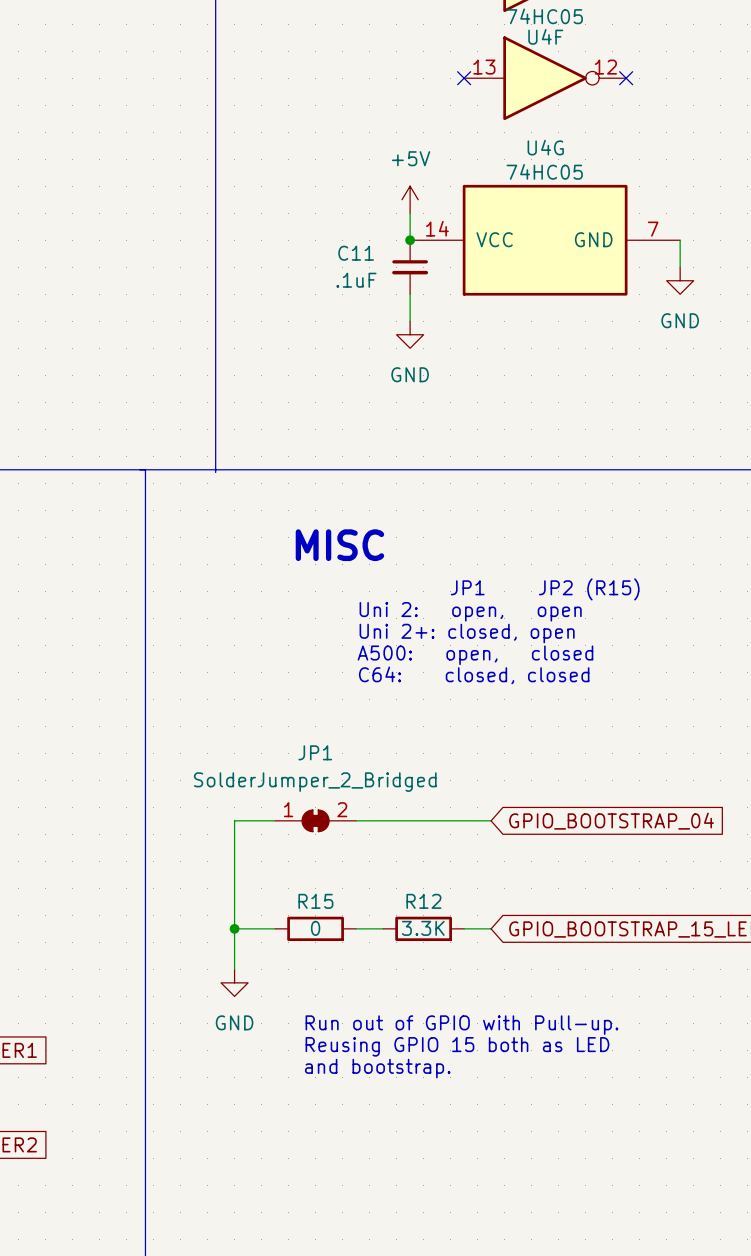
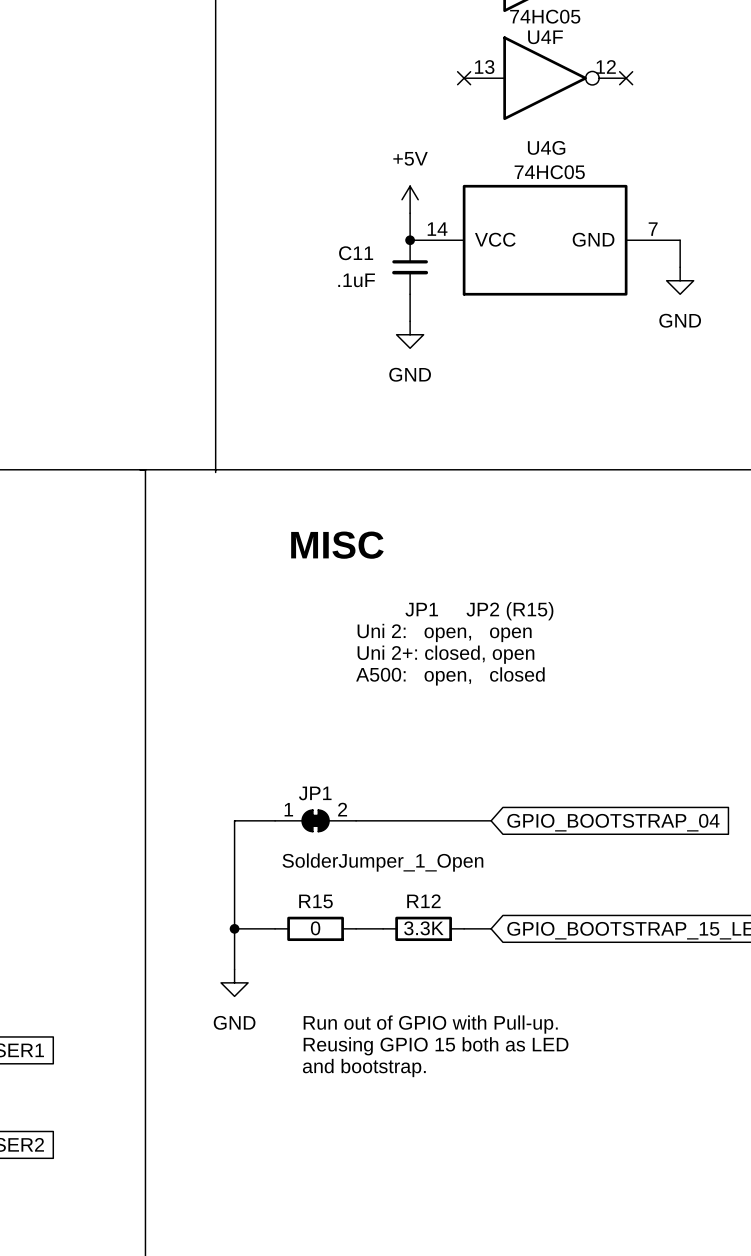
text: JP1 JP2 (R15) (545, 589) -> none
text: Uni 2: open, open (470, 611) -> JP1 JP2 (R15) (479, 611)
text: Uni 2+: closed, open (467, 633) -> Uni 2: open, open (444, 632)
text: A500: open, closed (475, 655) -> Uni 2+: closed, open (445, 654)
text: C64: closed, closed (474, 675) -> A500: open, closed (450, 676)
JP1 name position: JP1 (315, 752) -> JP1 (315, 793)
JP1 value: SolderJumper_2_Bridged (315, 782) -> SolderJumper_1_Open (382, 862)

